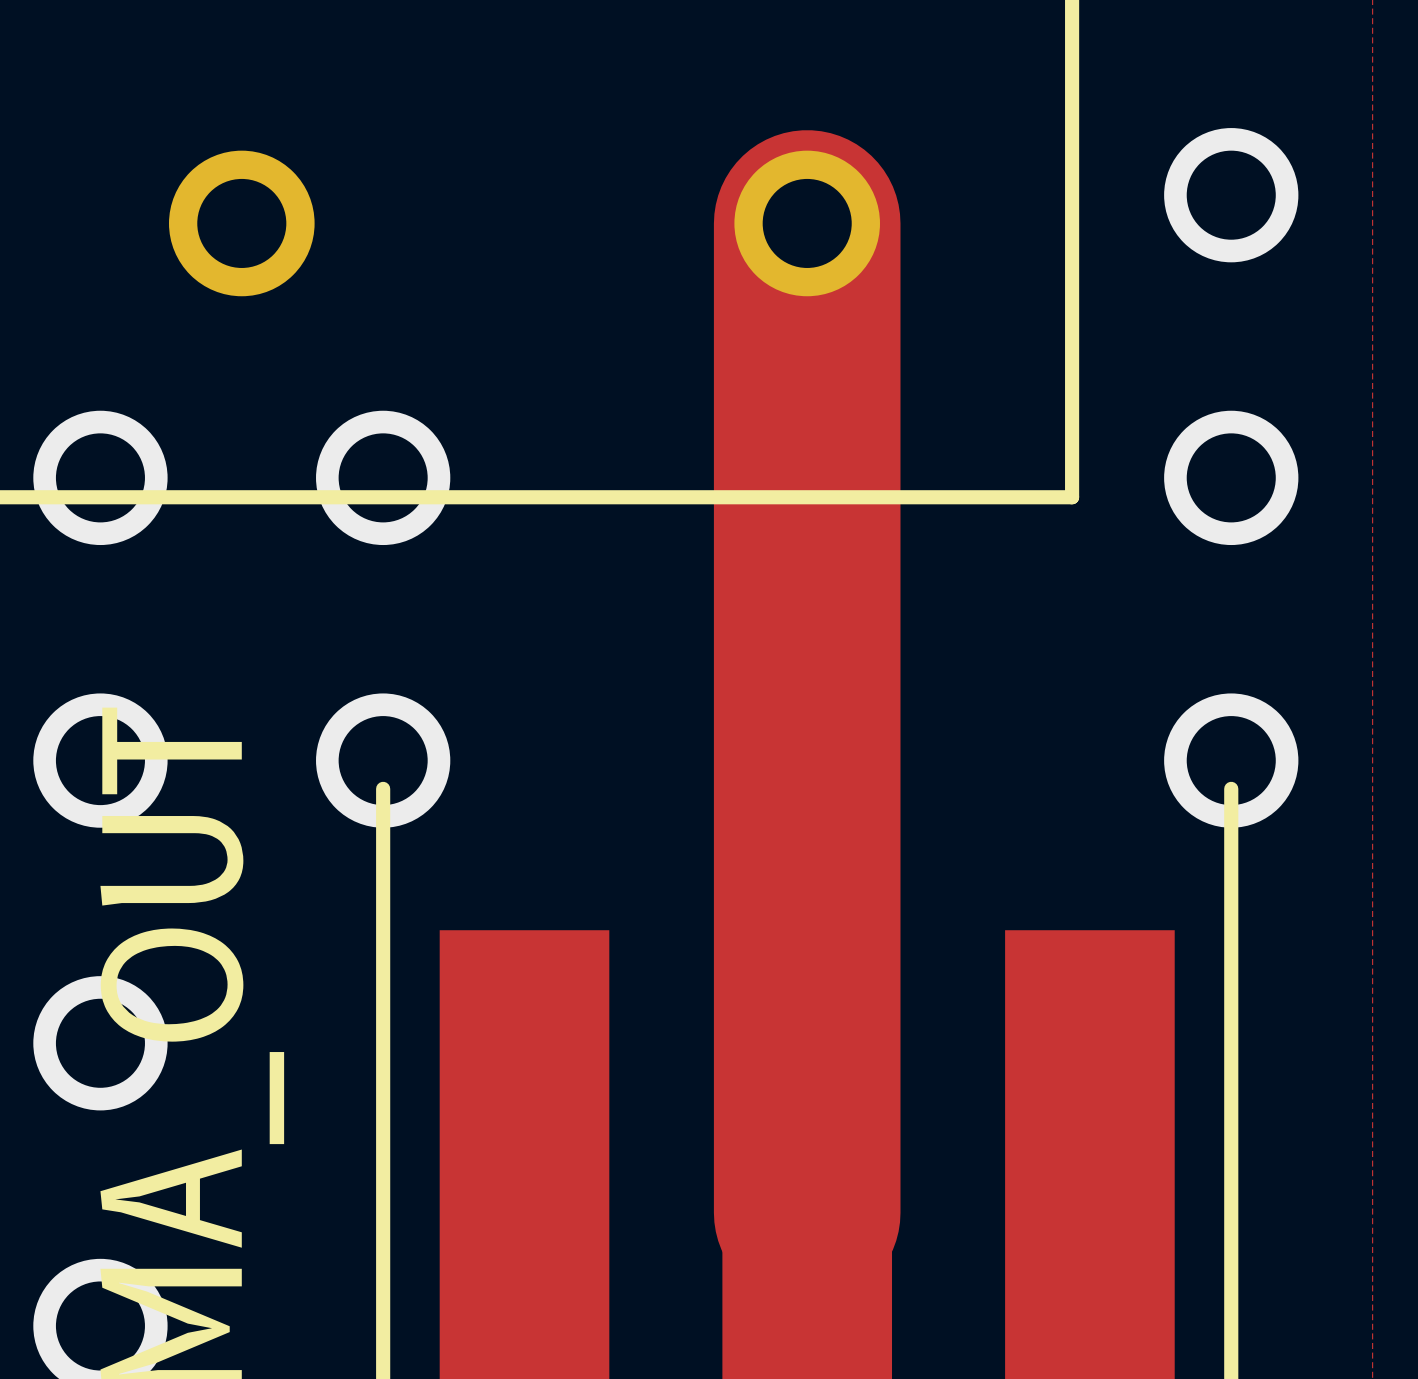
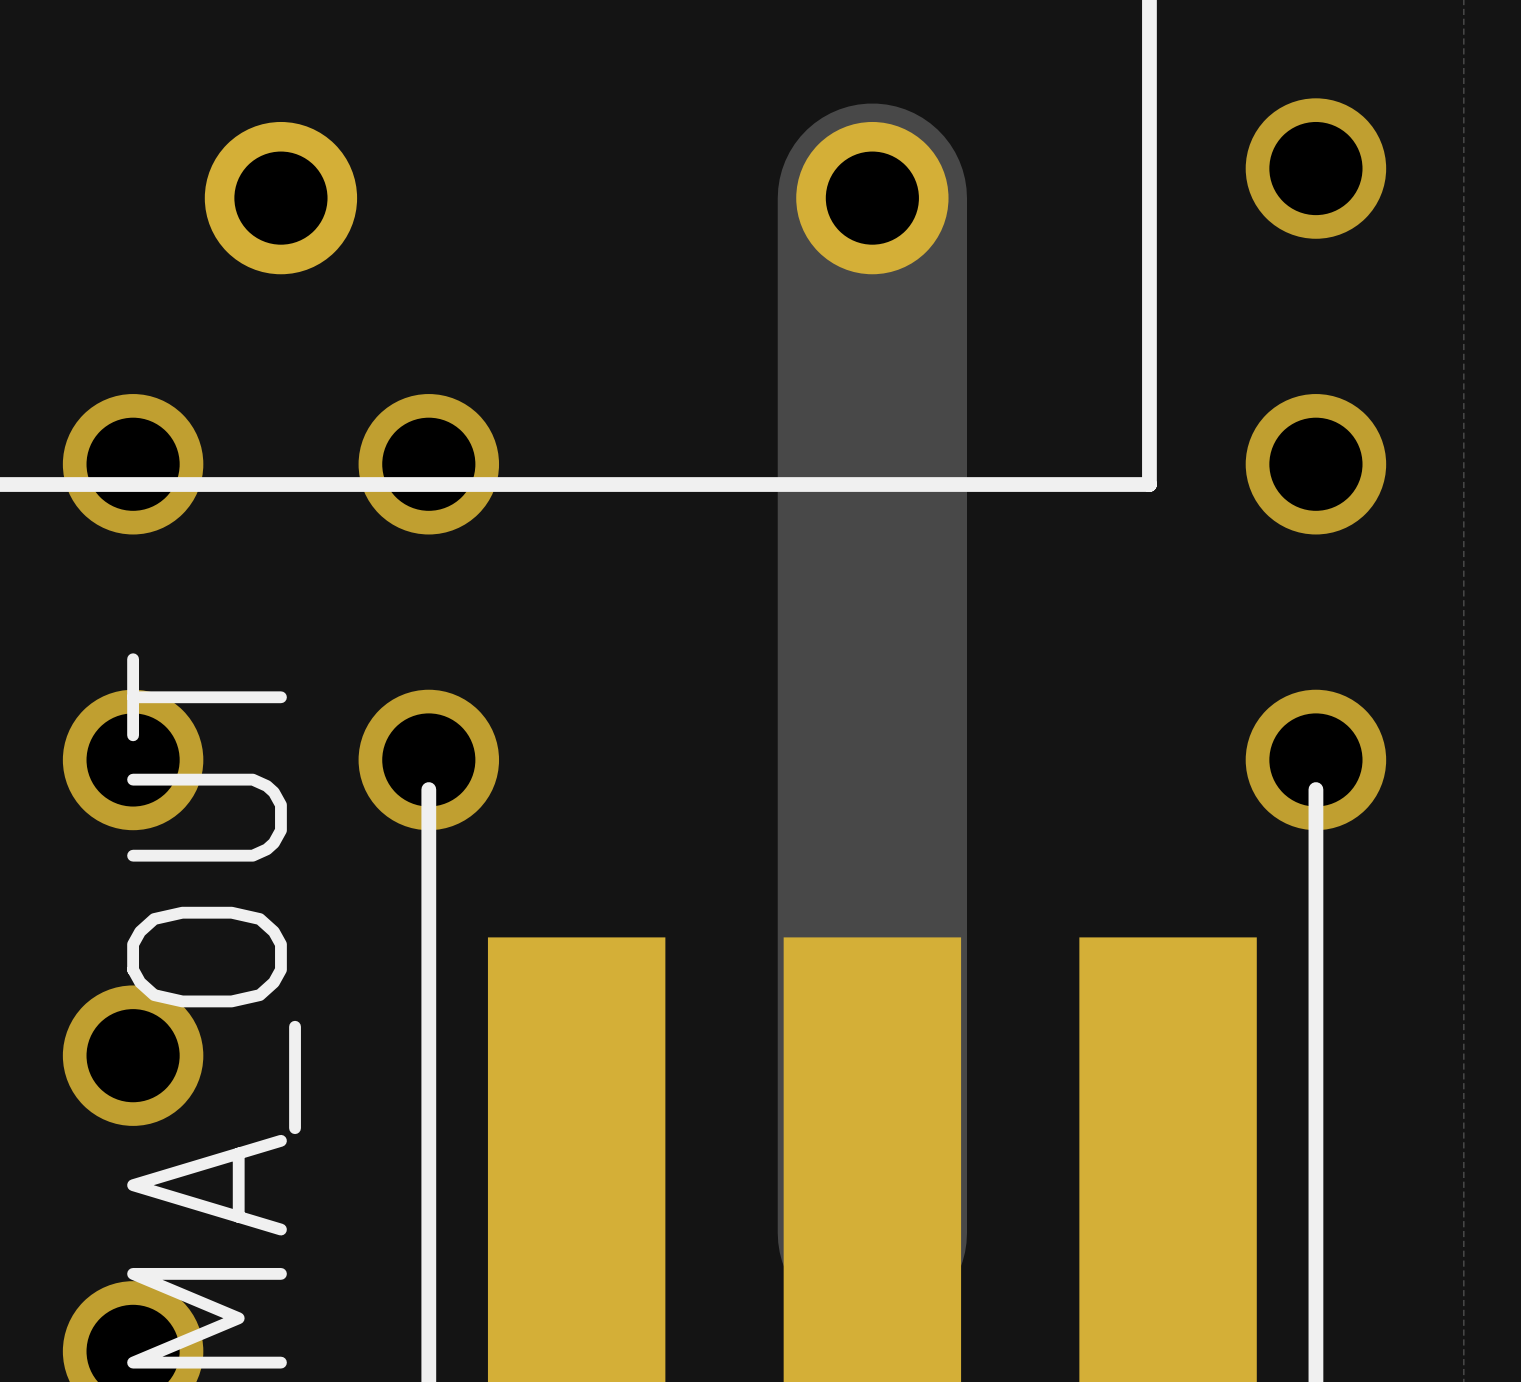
track width: thick (807, 223) (807, 1212) -> thin (872, 198) (872, 1233)

